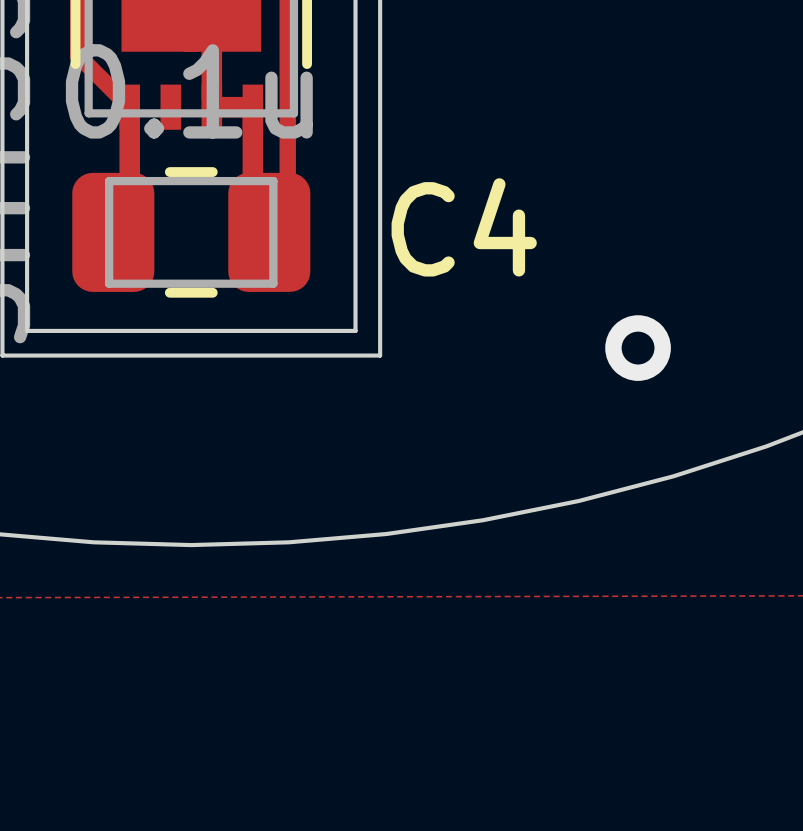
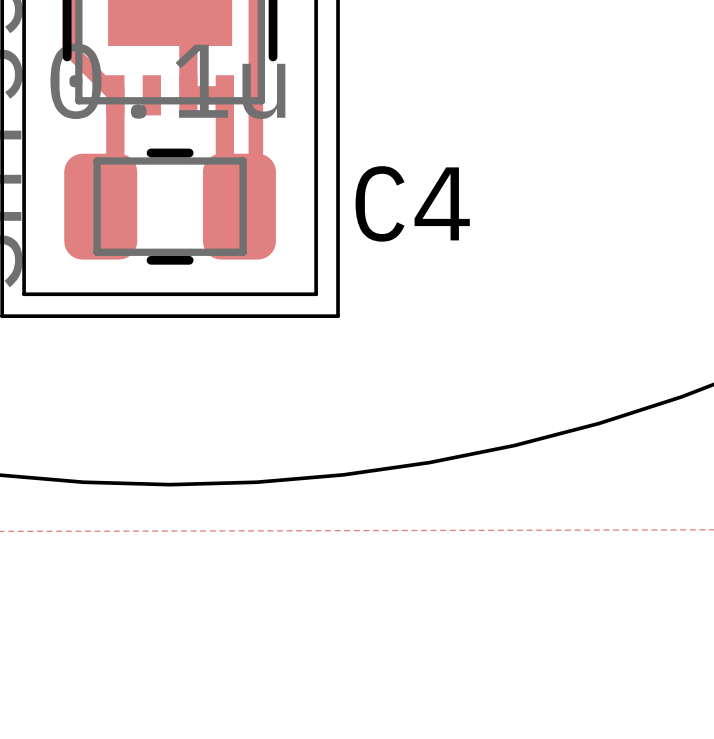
via: (638, 348) -> none

